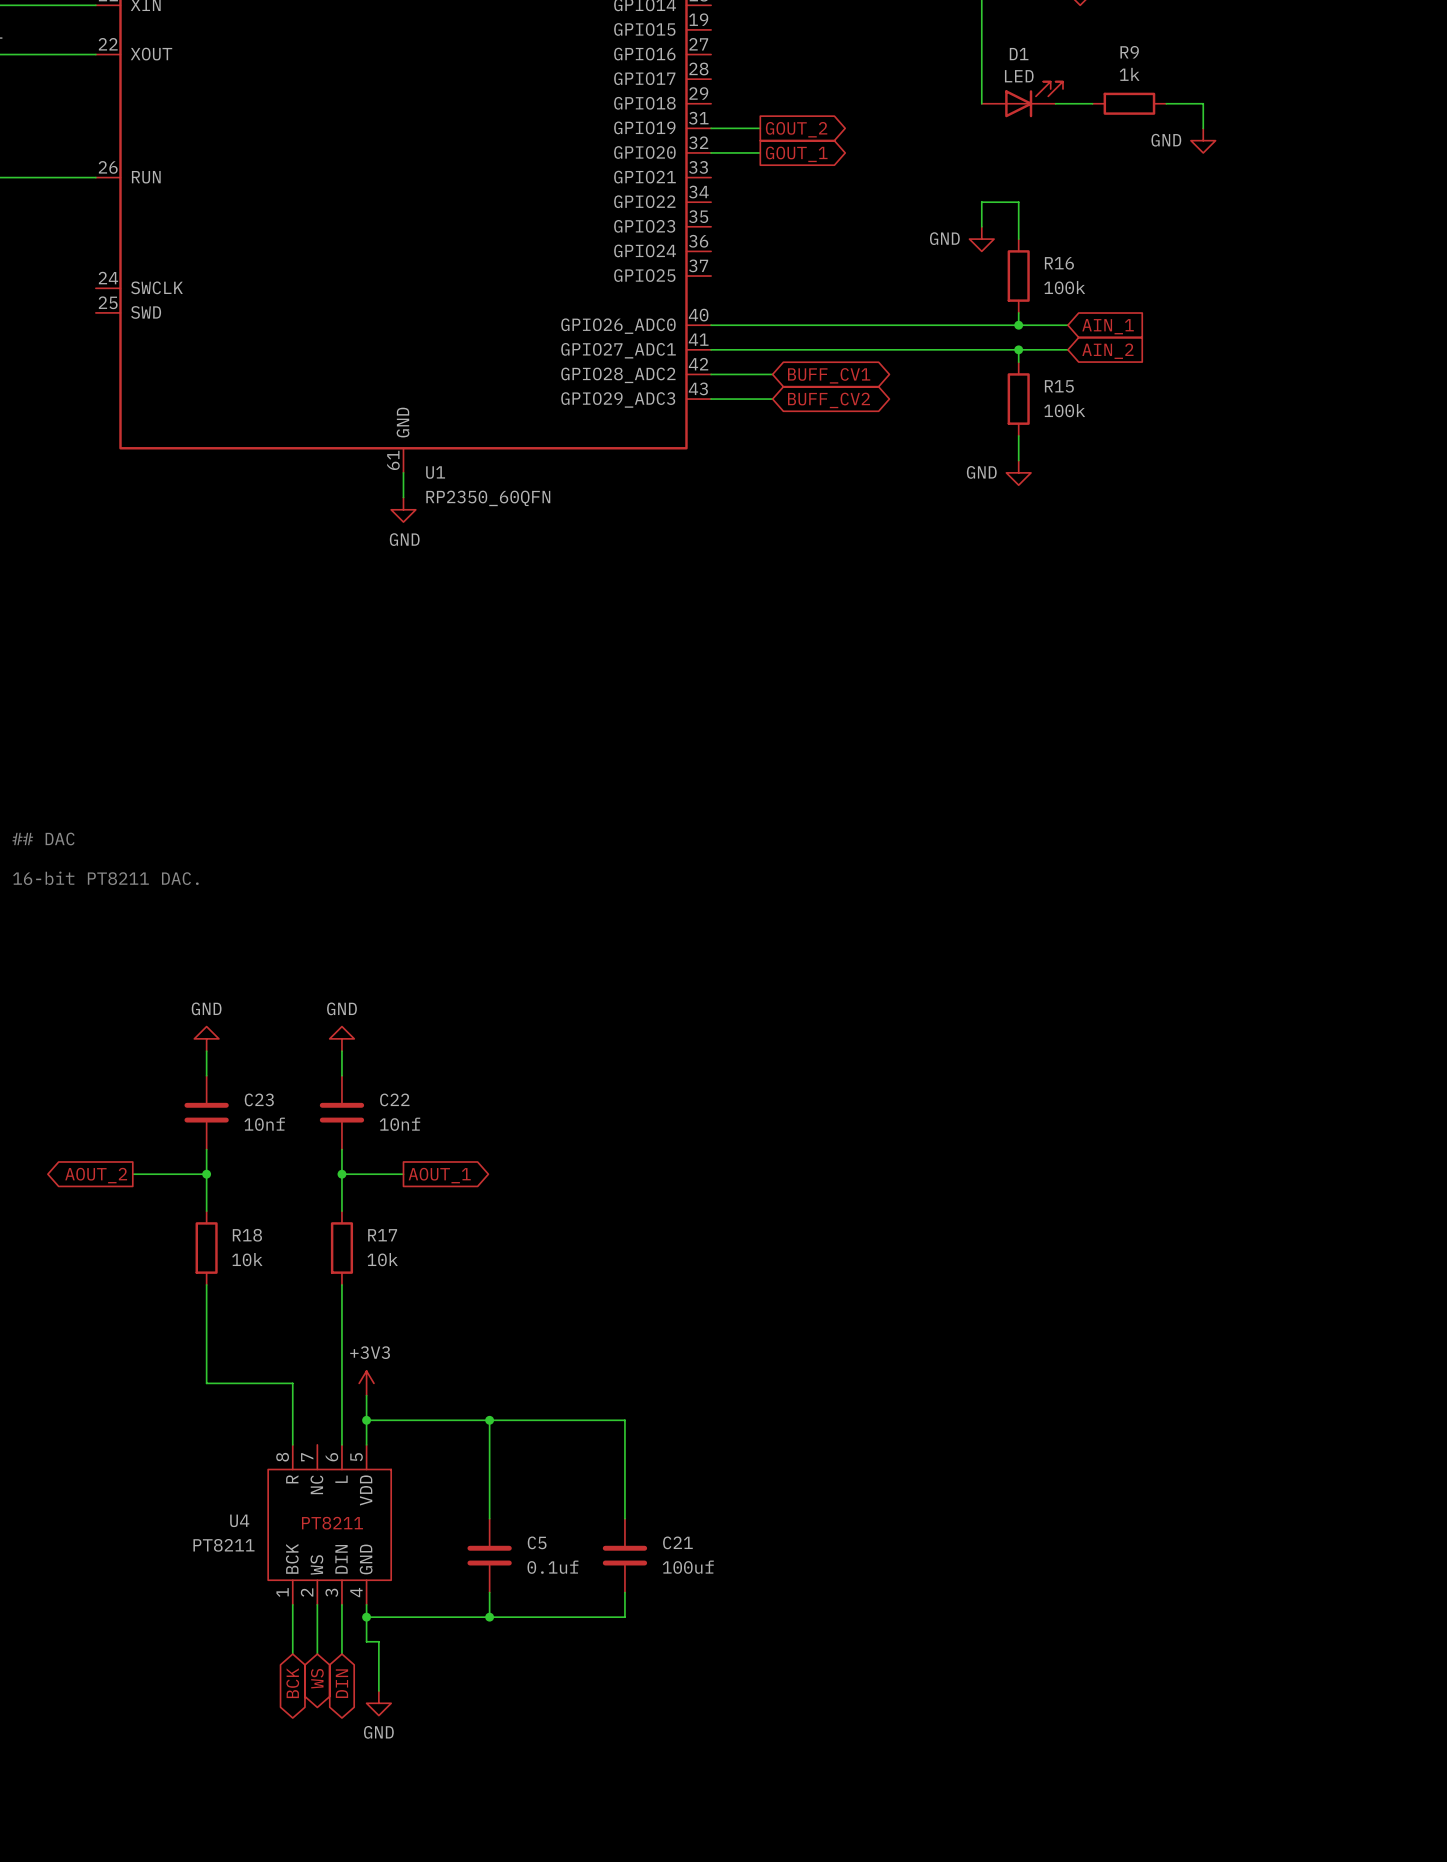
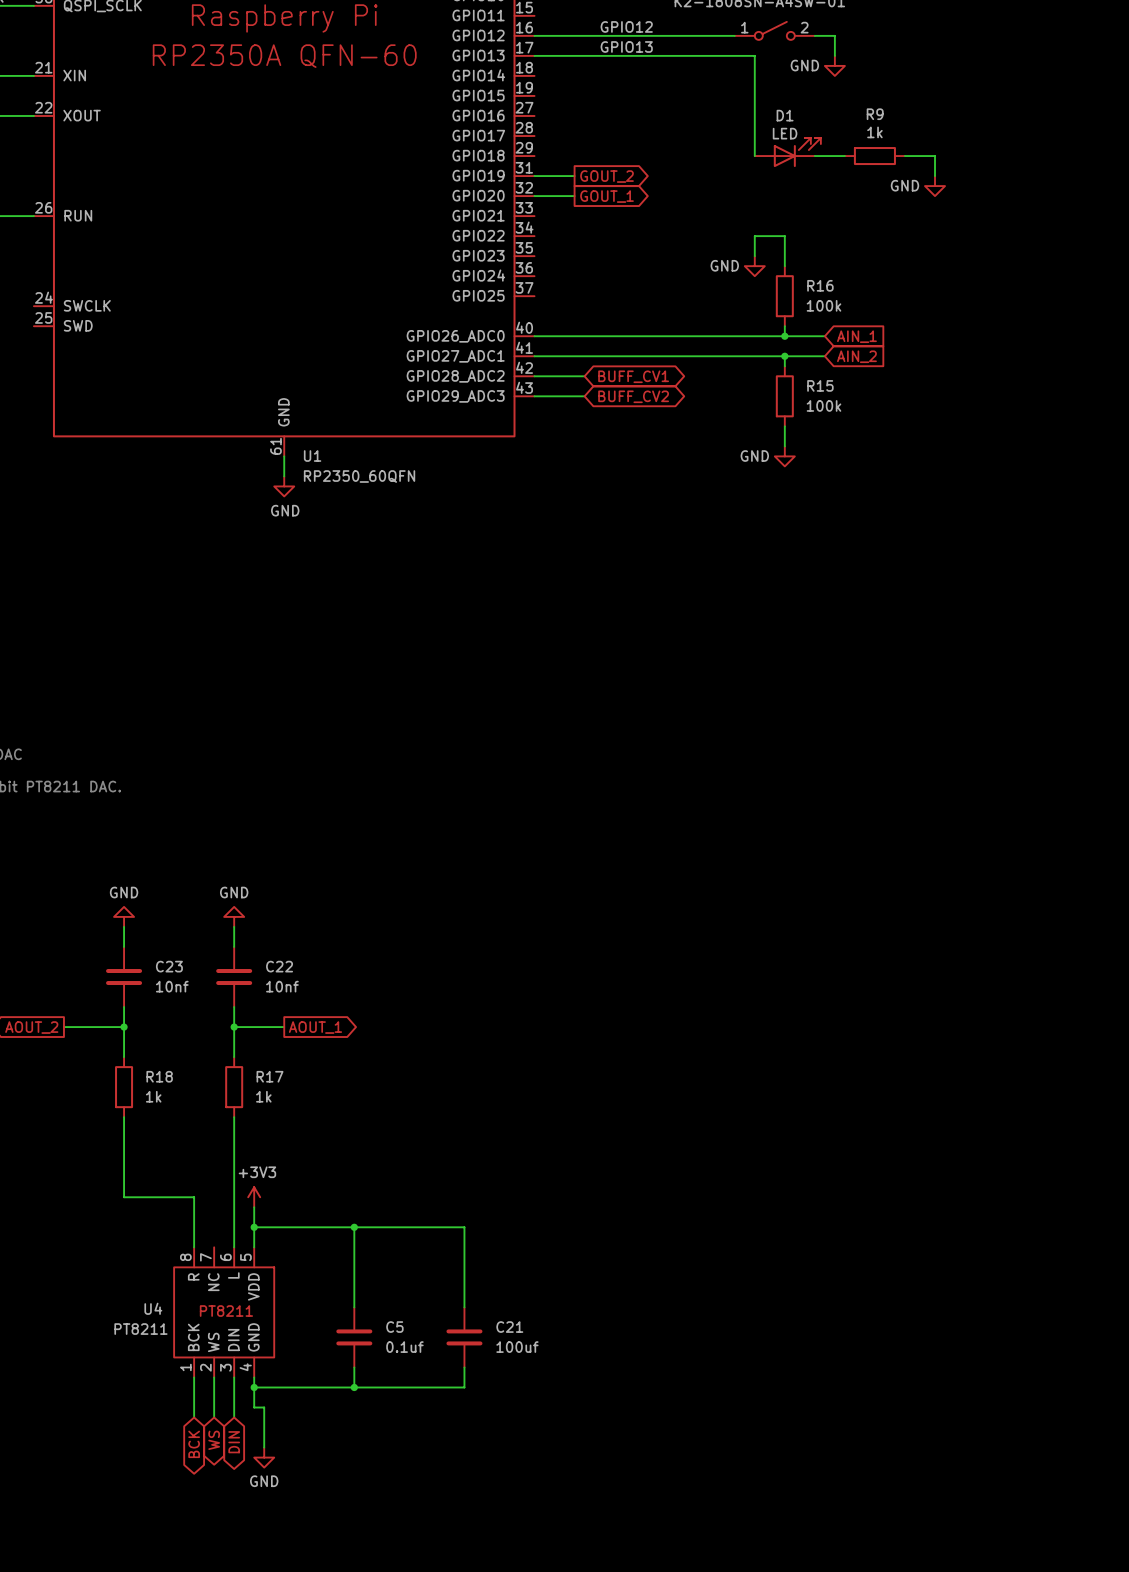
R18 value: 10k (247, 1259) -> 1k (153, 1096)
R17 value: 10k (382, 1259) -> 1k (263, 1096)

